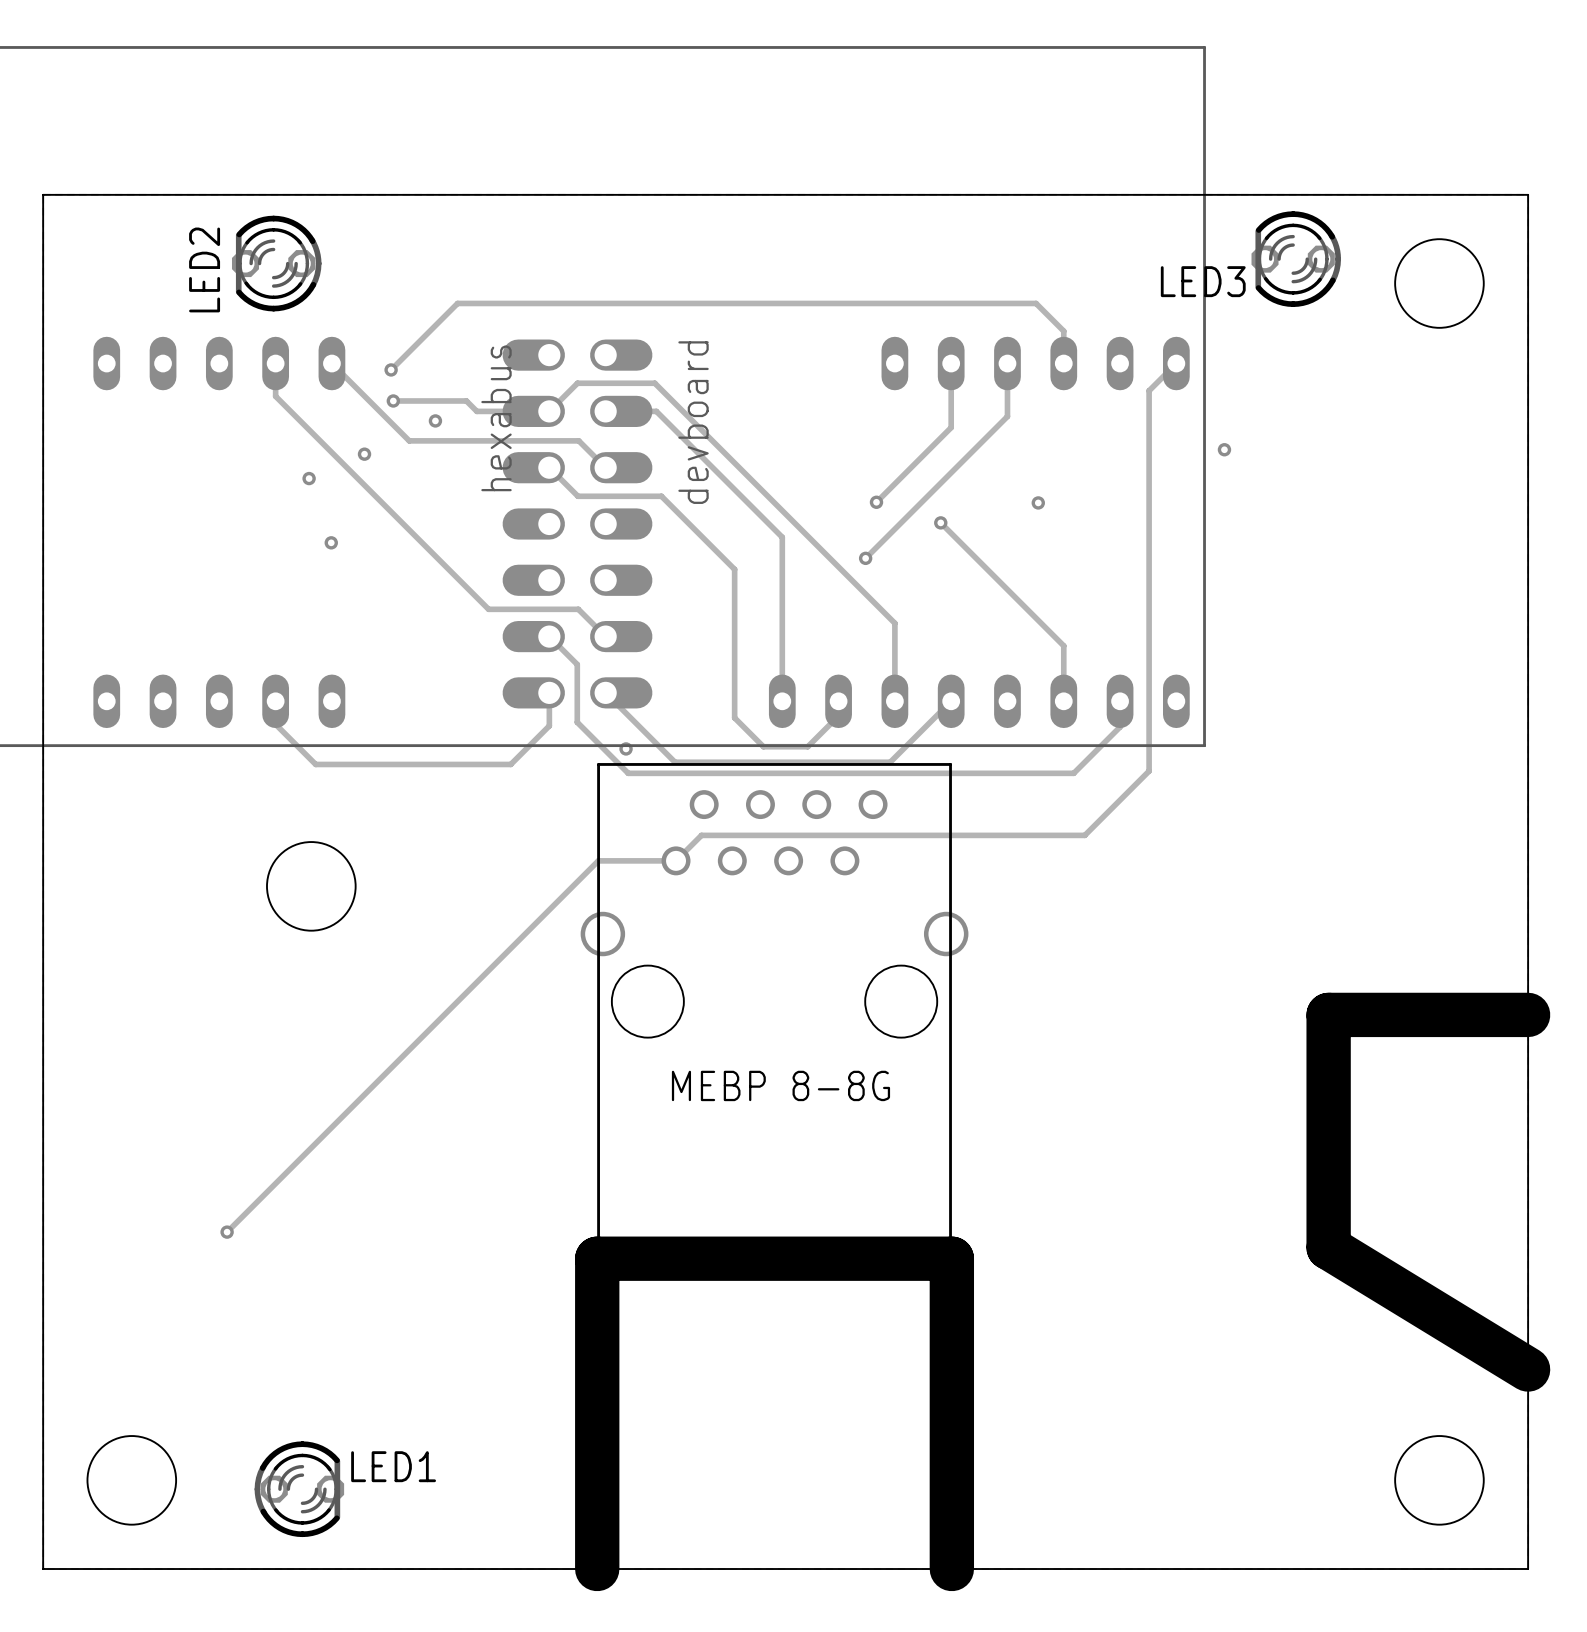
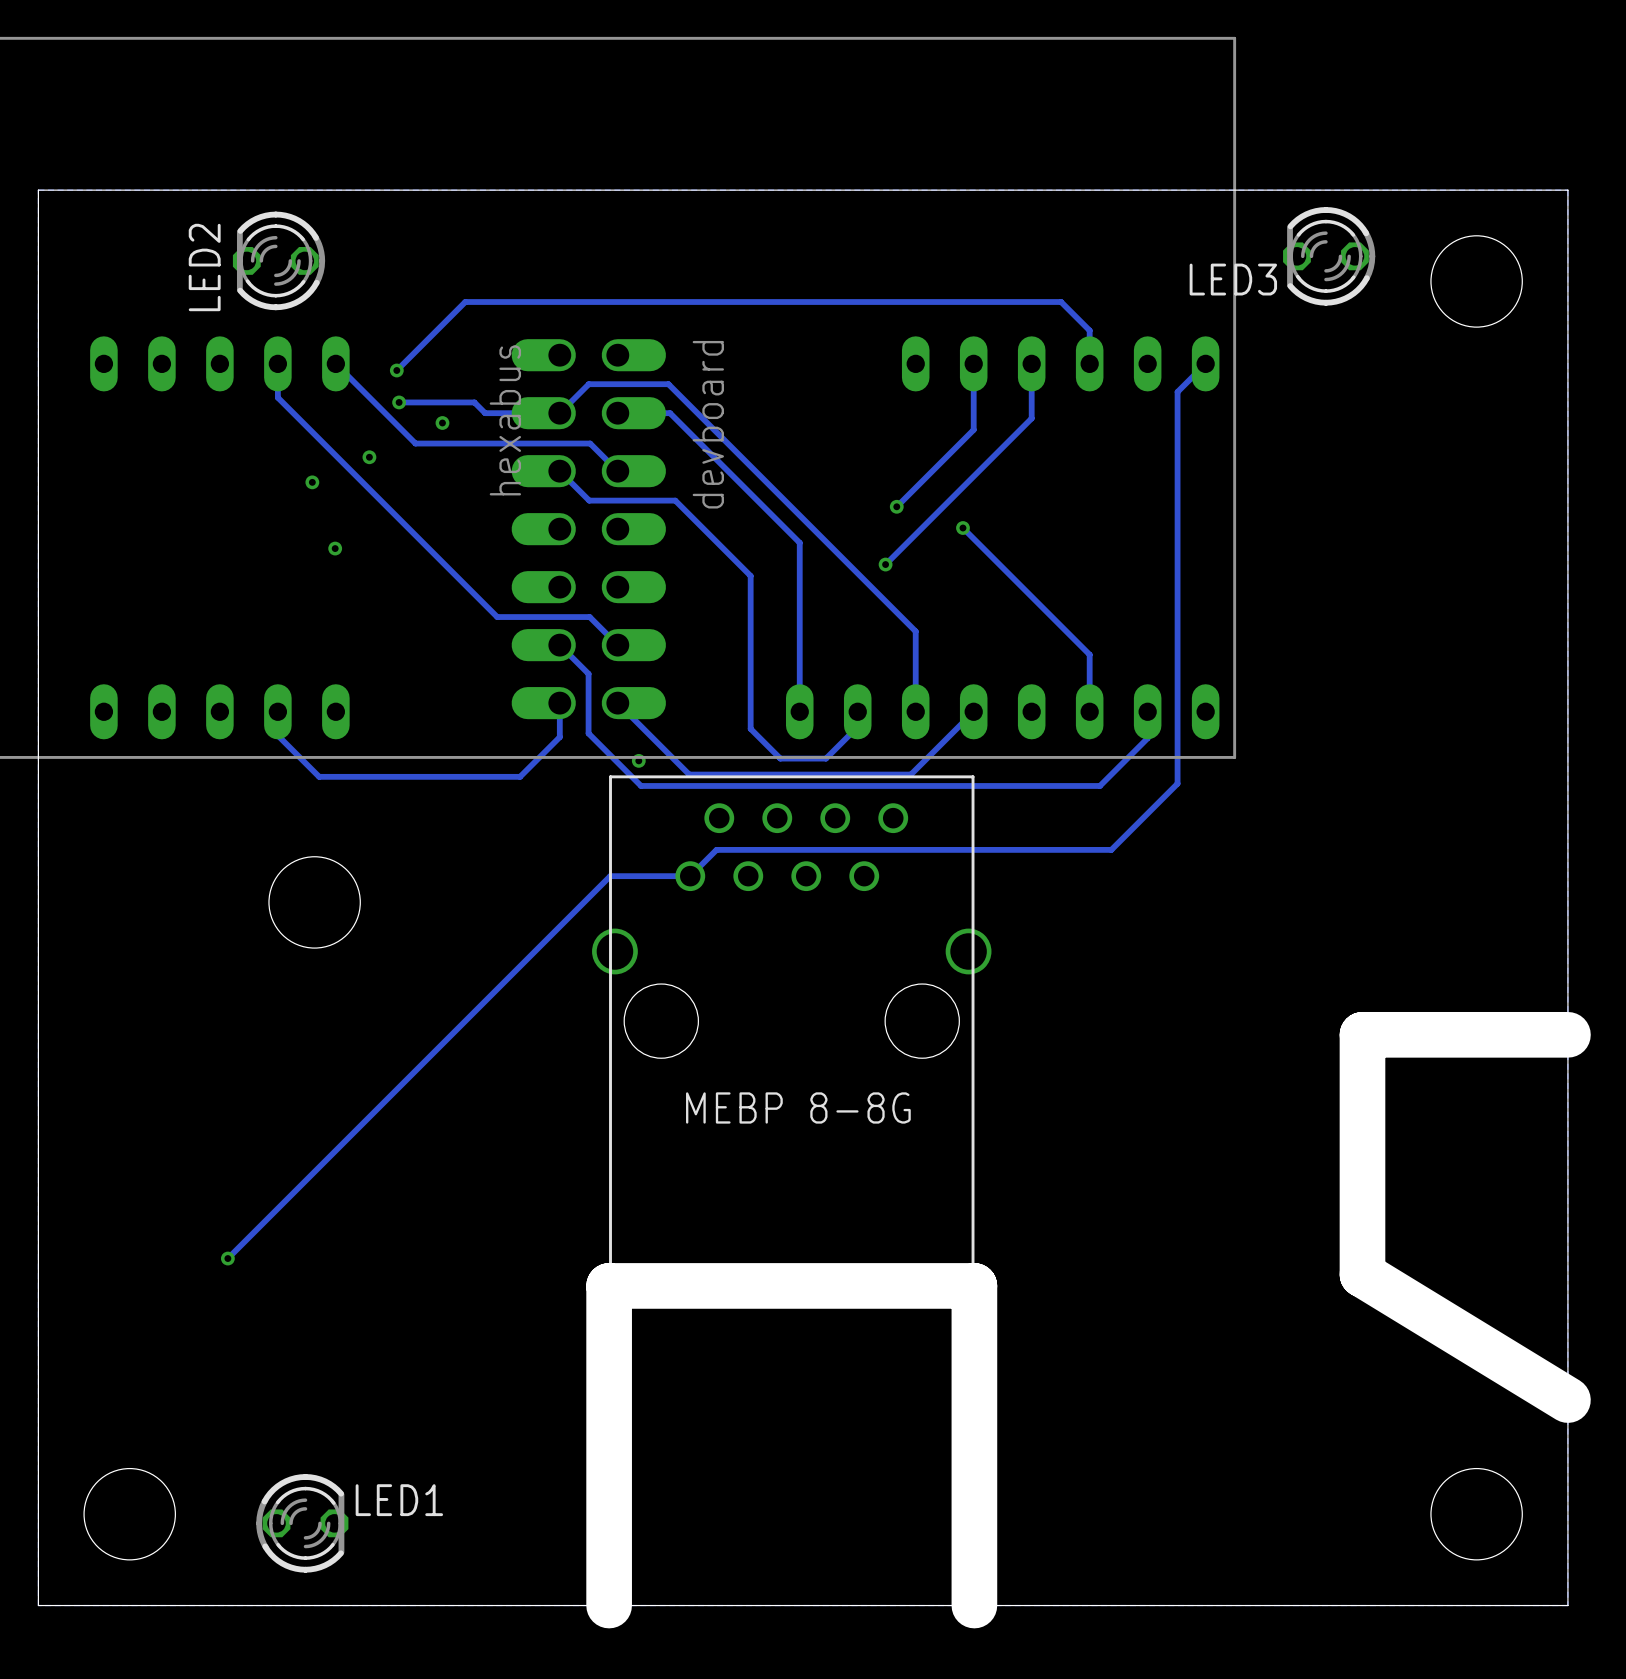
via: (1224, 449) -> none
via: (1038, 502) -> none

